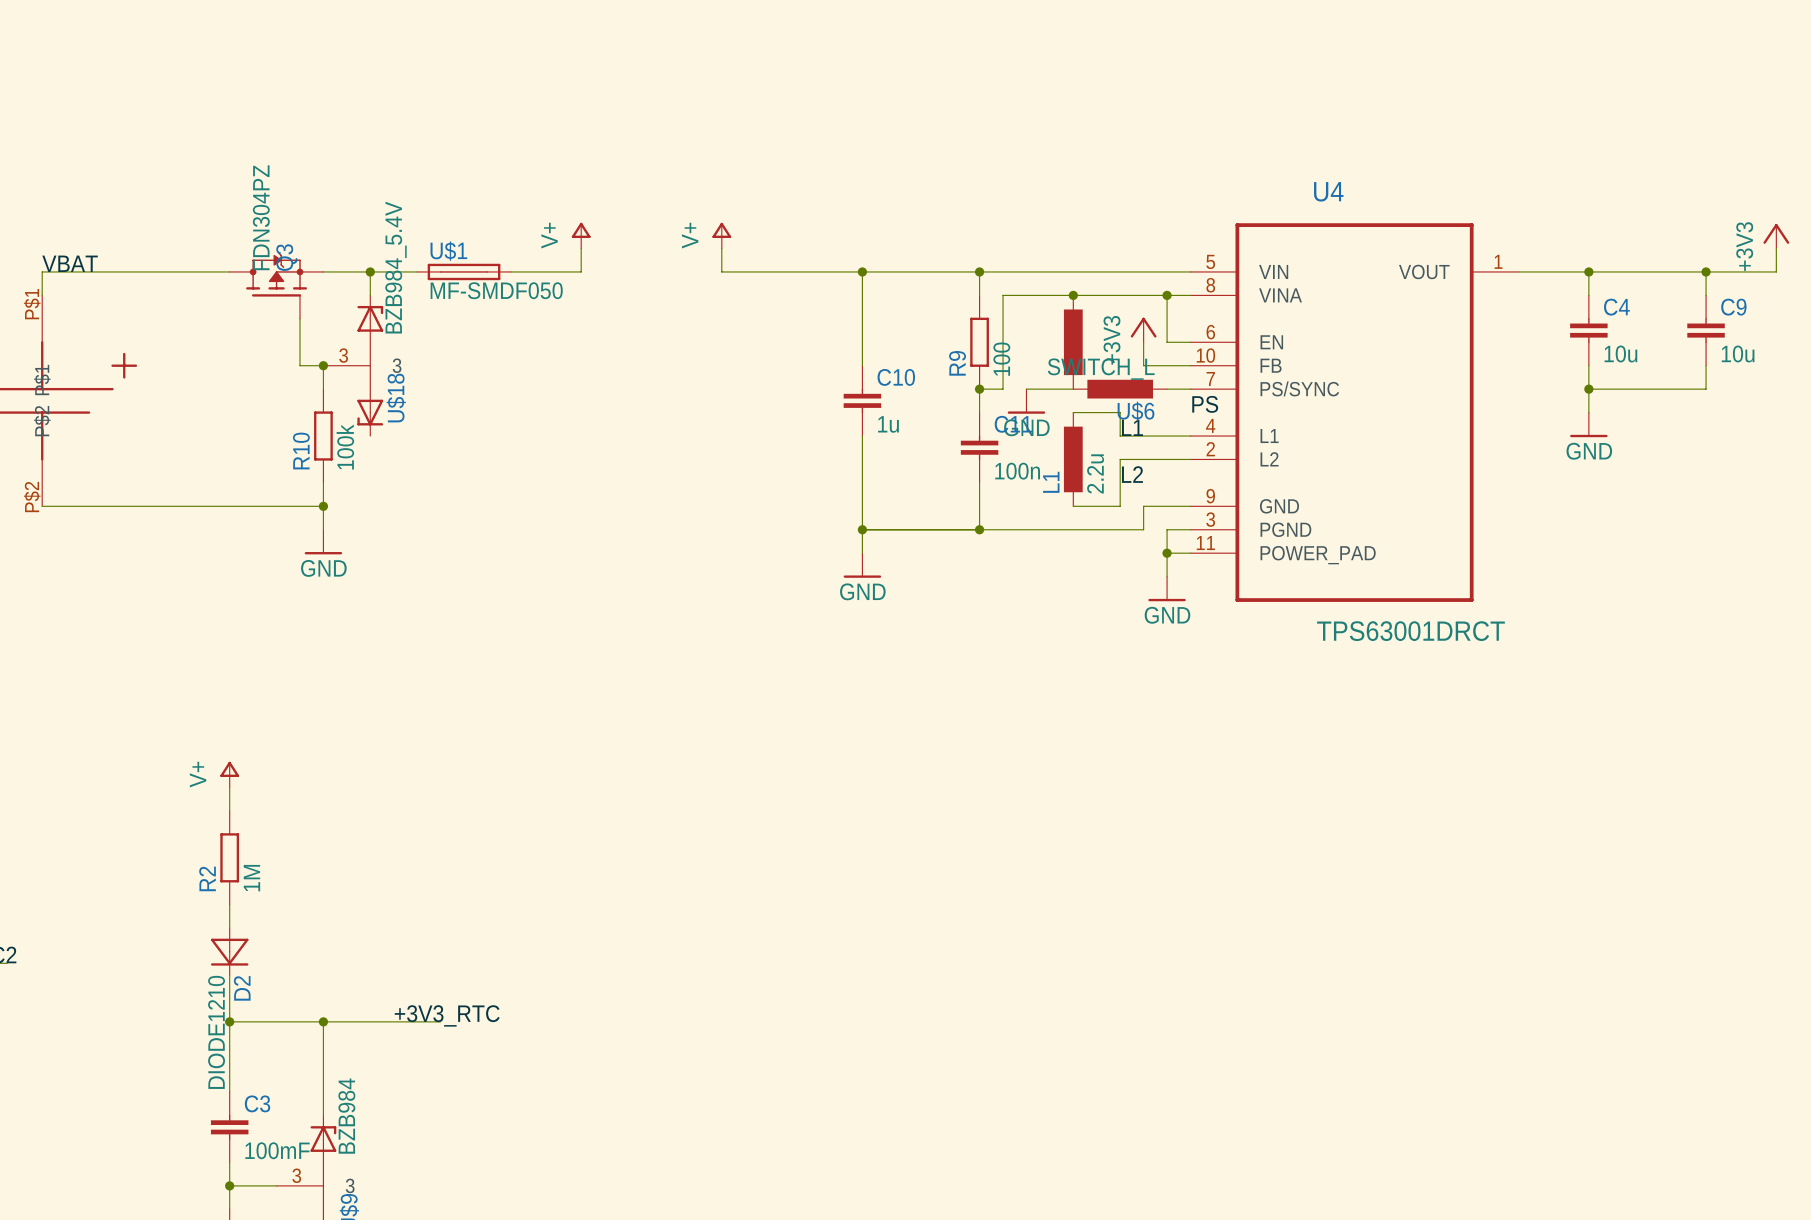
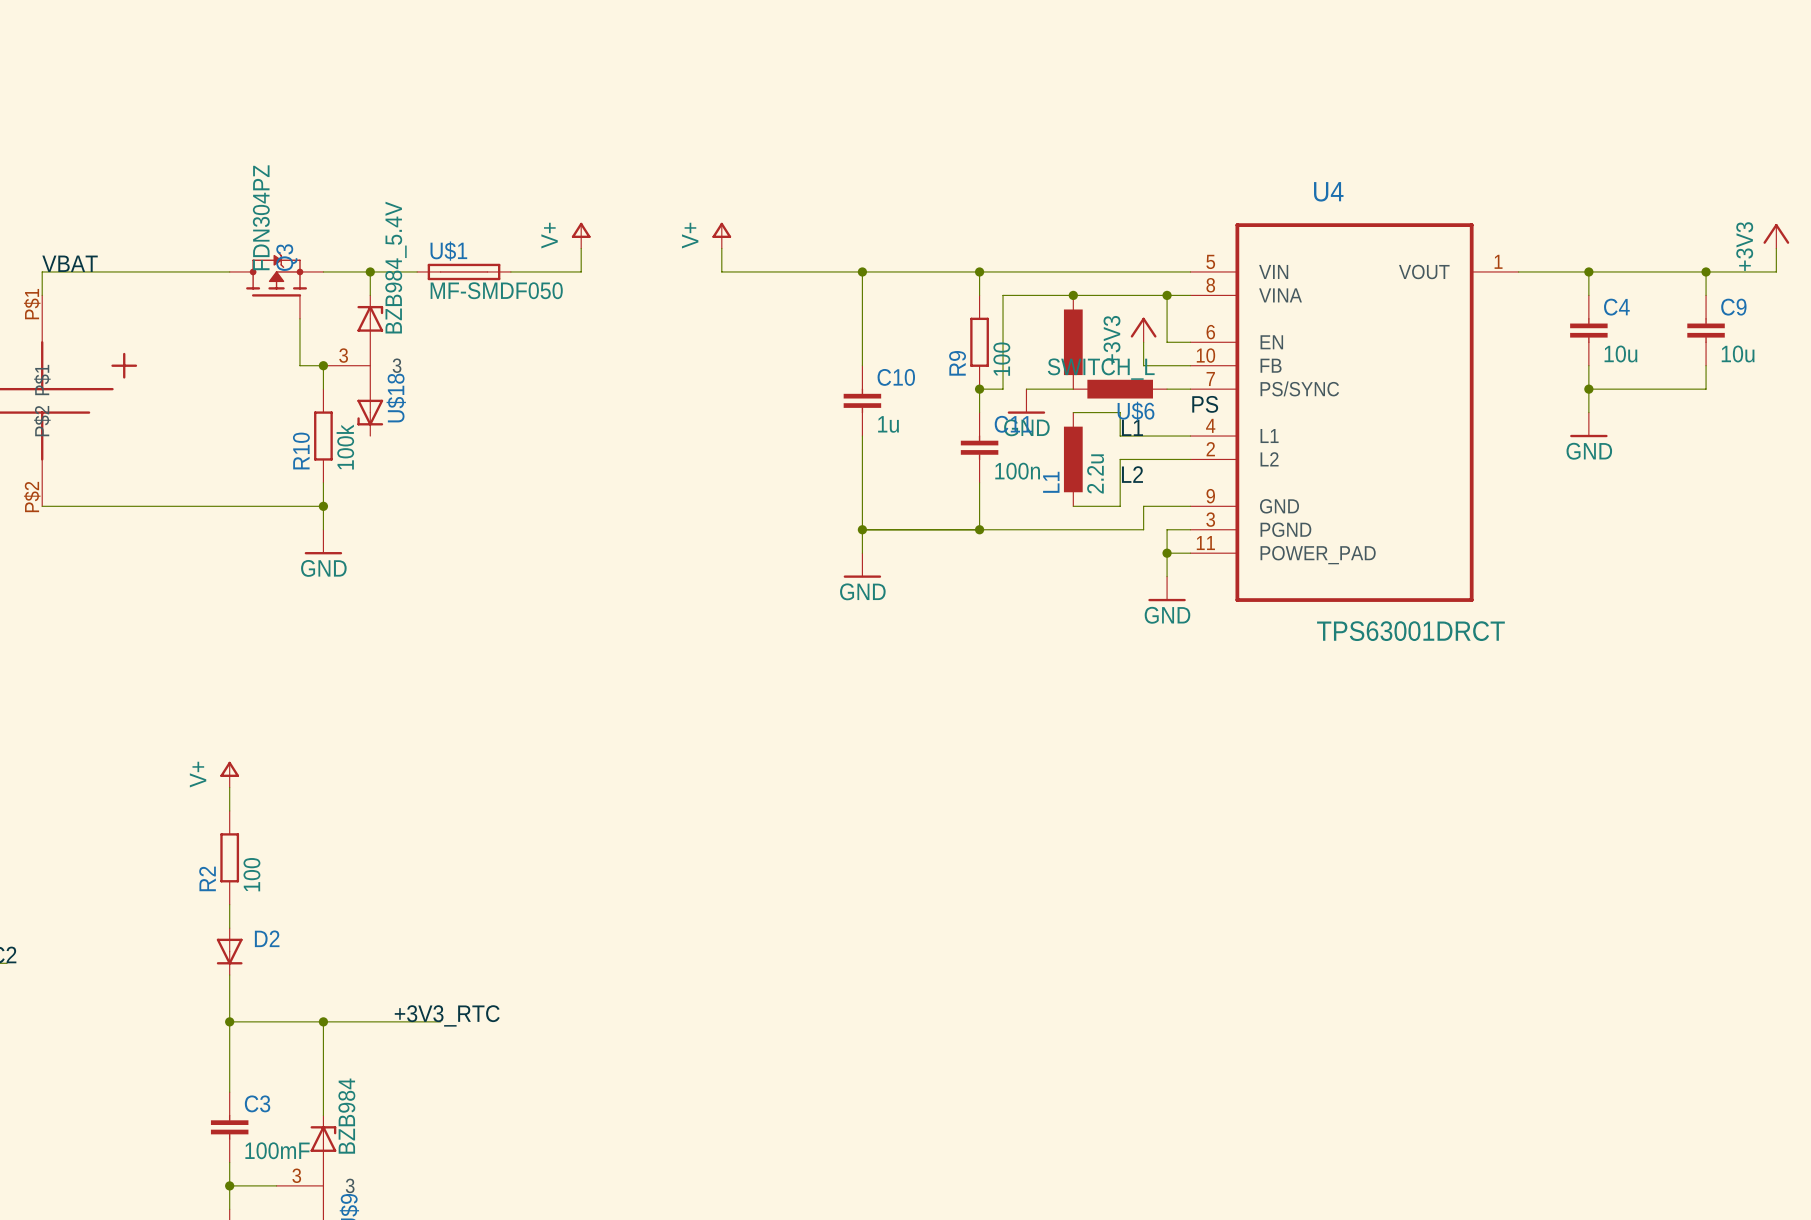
R2 value: 1M (251, 878) -> 100 (251, 874)
D2 symbol: [210, 928, 249, 976] -> [216, 928, 243, 976]
D2 name rotation: 0° (242, 988) -> 90° clockwise (267, 938)
D2 name position: D2 (242, 988) -> D2 (267, 938)
D2 value: DIODE1210 (216, 1032) -> none

